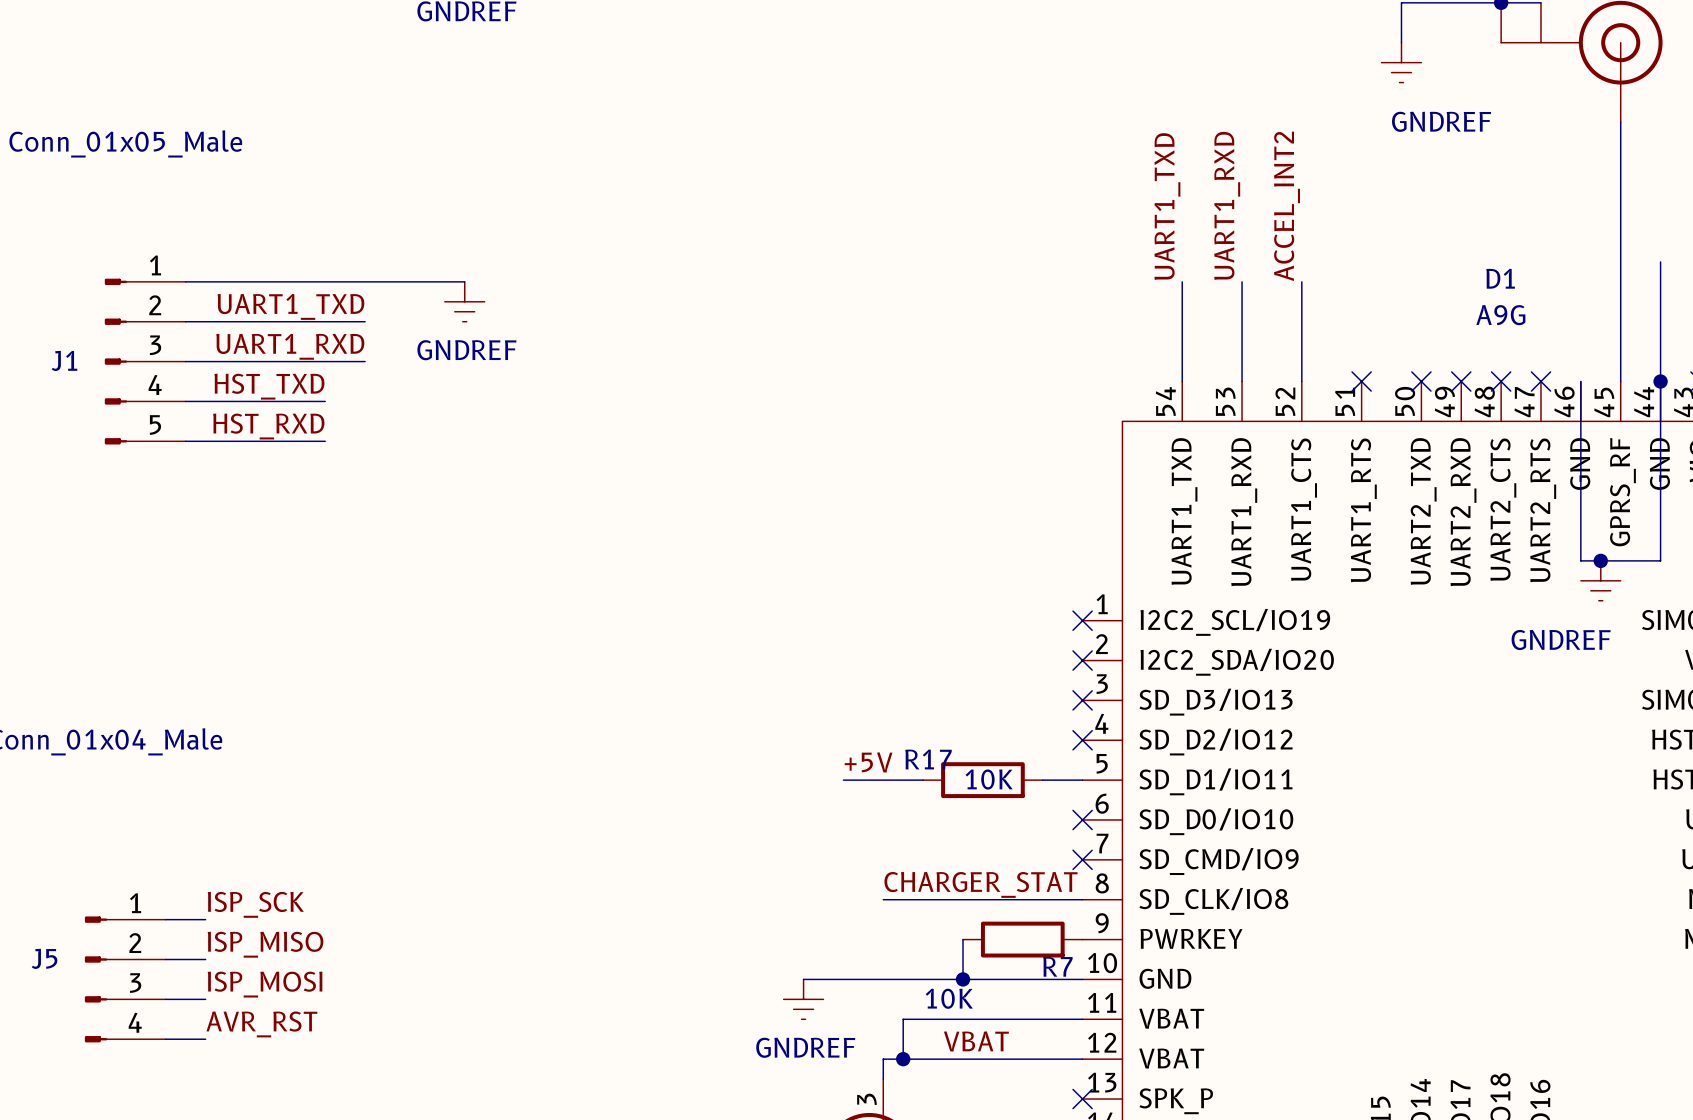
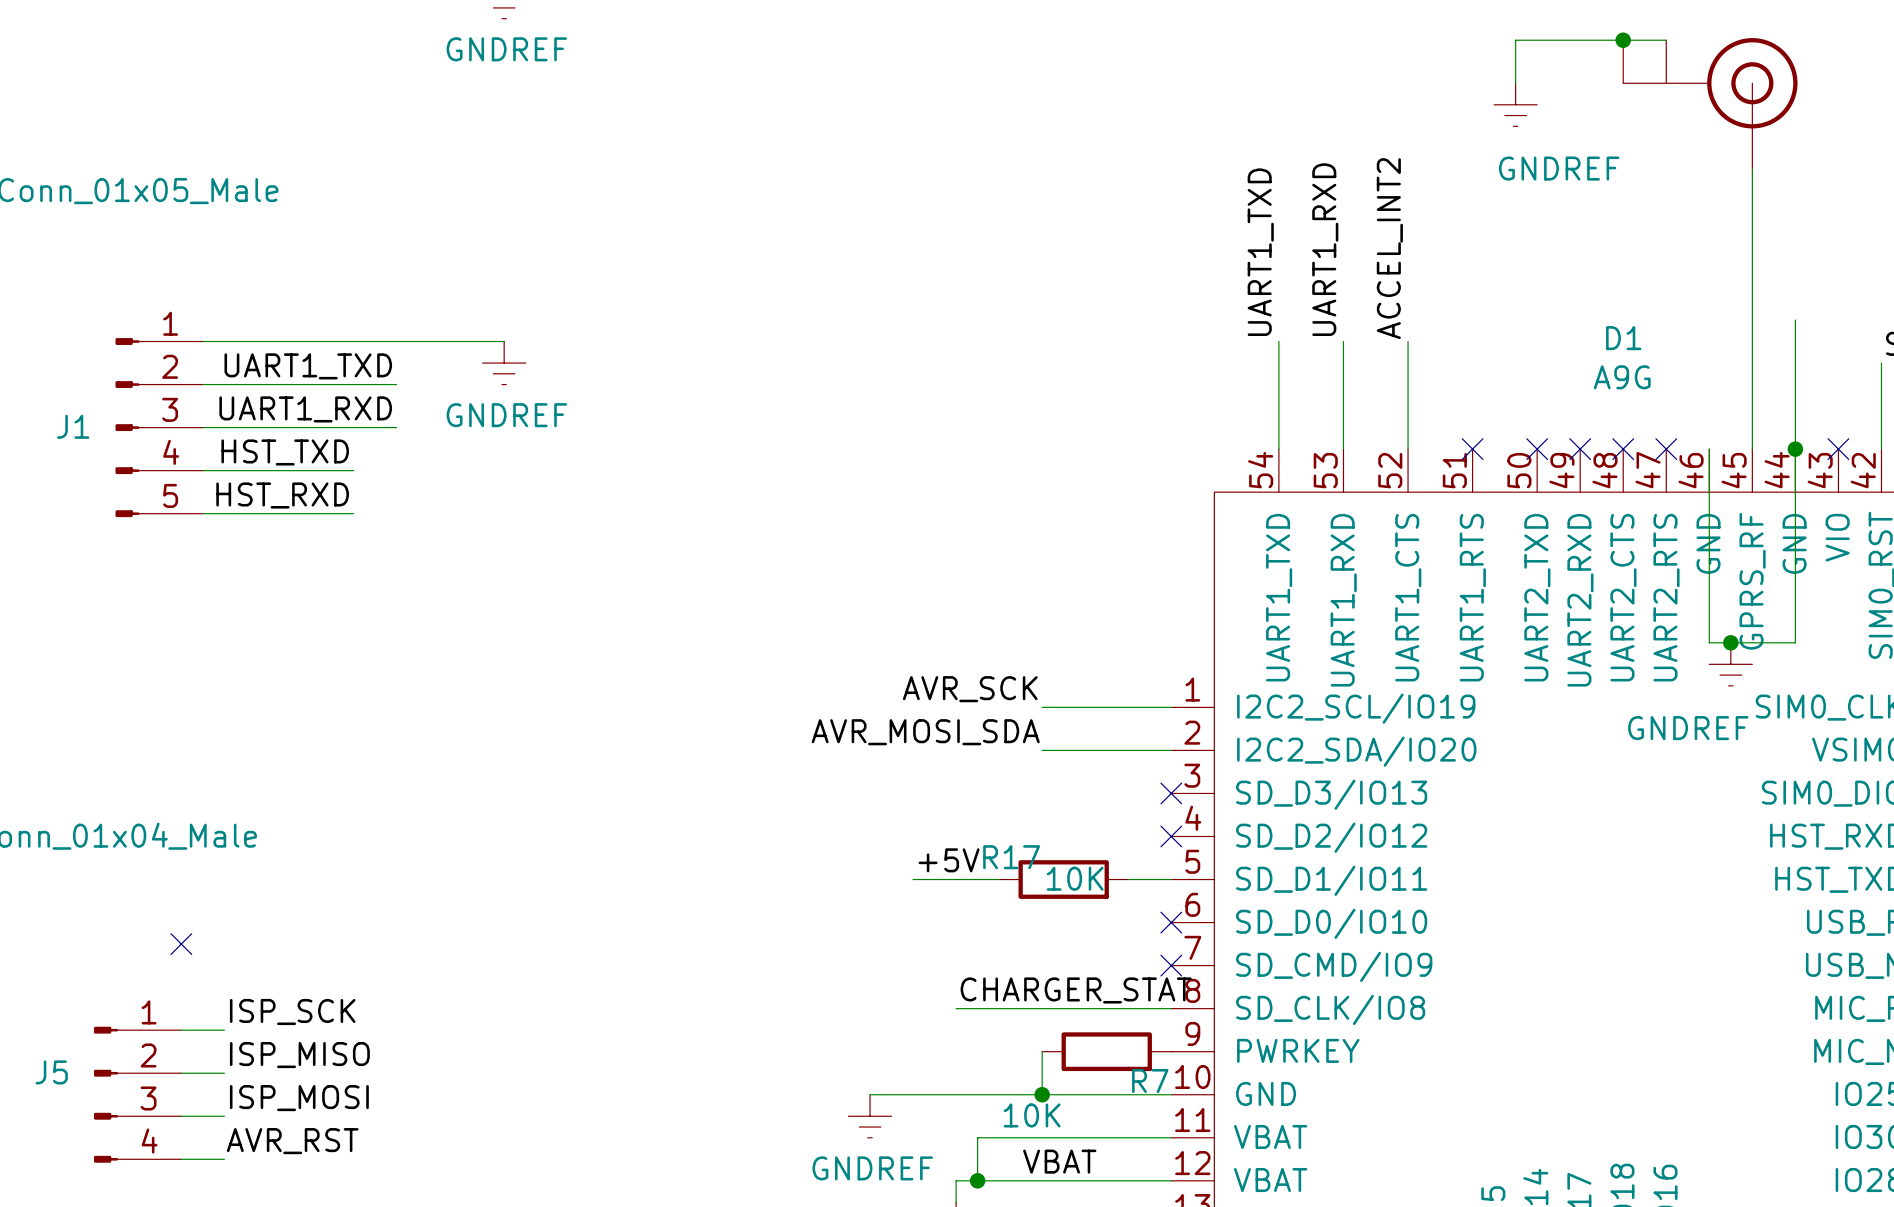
label: none -> AVR_SCK (970, 689)
wire: none -> (1042, 707) (1171, 707)
no-connect mark: (1082, 620) -> none
label: none -> AVR_MOSI_SDA (925, 732)
wire: none -> (1042, 750) (1171, 750)
no-connect mark: (1082, 660) -> none
no-connect mark: none -> (181, 944)

